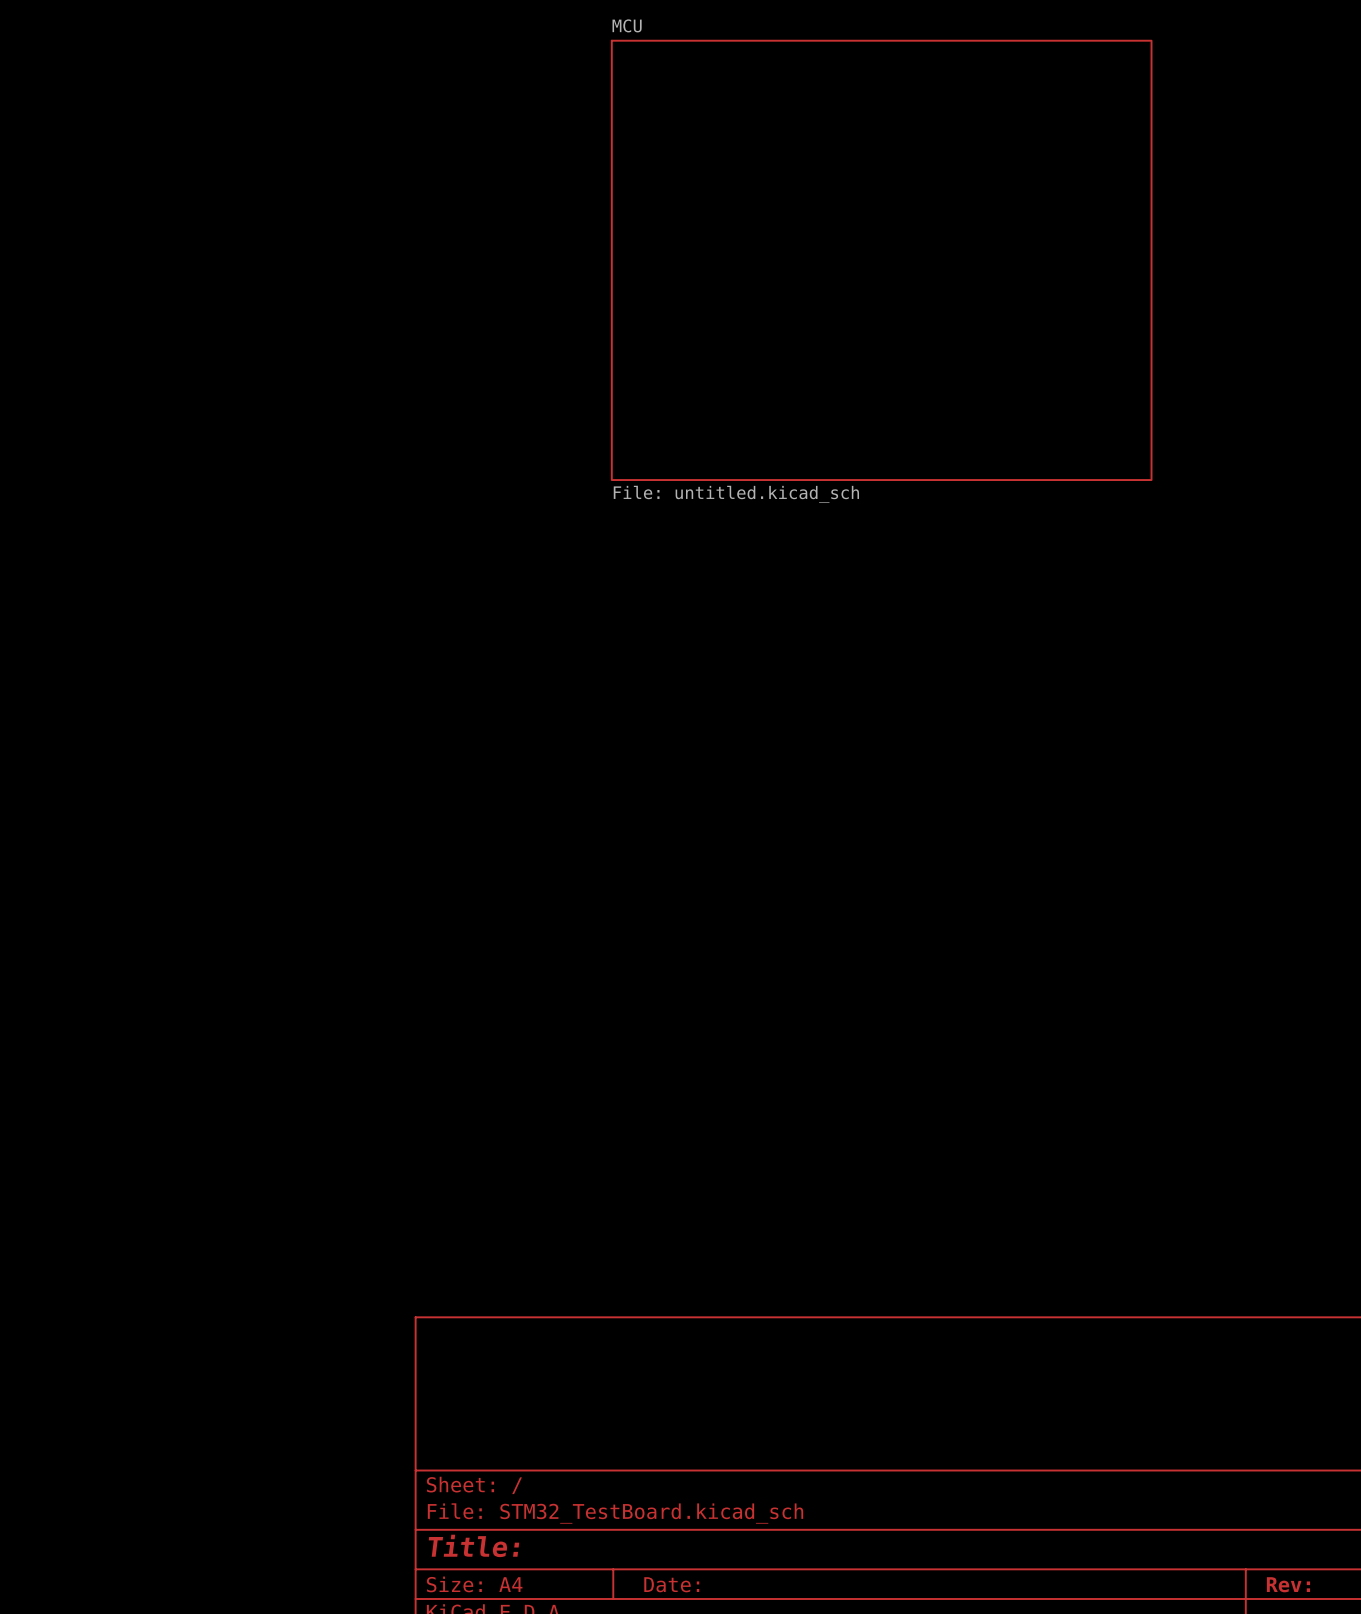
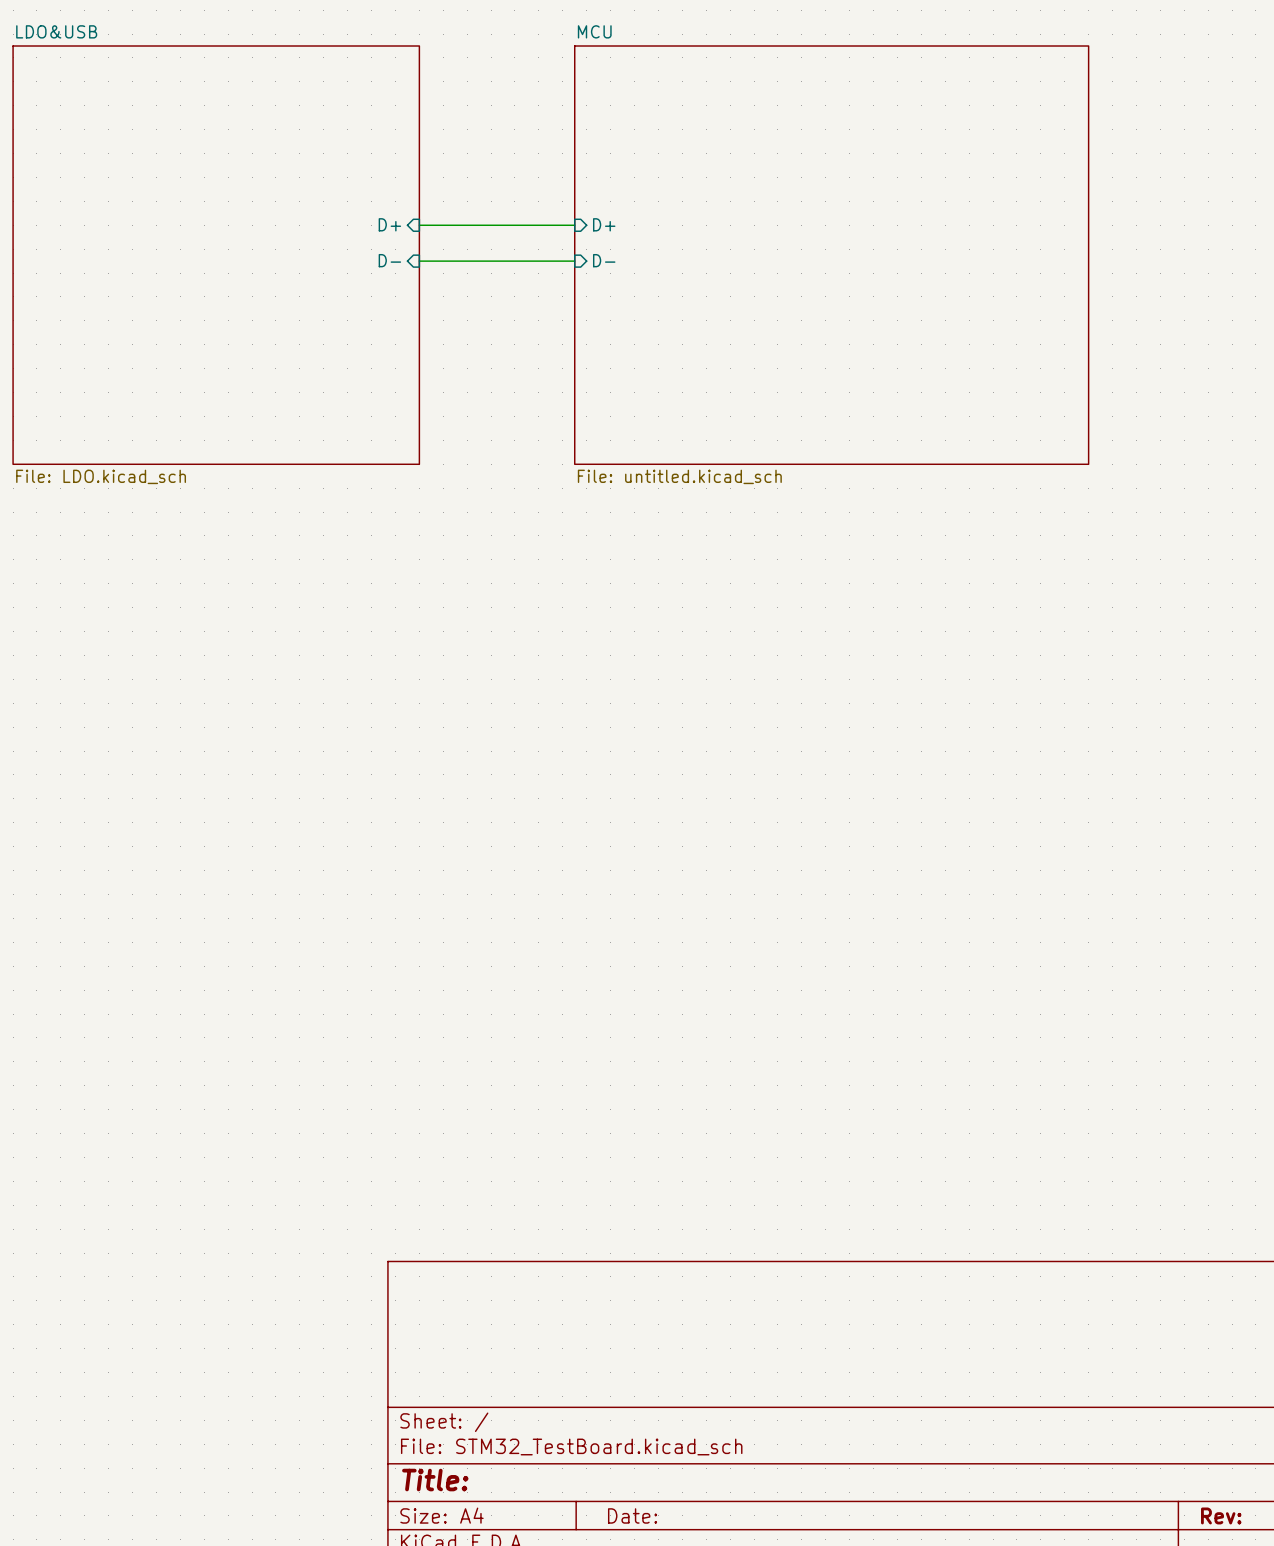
sheet pin: none -> D+ (389, 224)
wire: none -> (419, 225) (574, 225)
sheet pin: none -> D+ (604, 224)
sheet LDO&USB: none -> File: LDO.kicad_sch (216, 255)
sheet pin: none -> D- (389, 260)
wire: none -> (419, 261) (574, 261)
sheet pin: none -> D- (604, 260)

